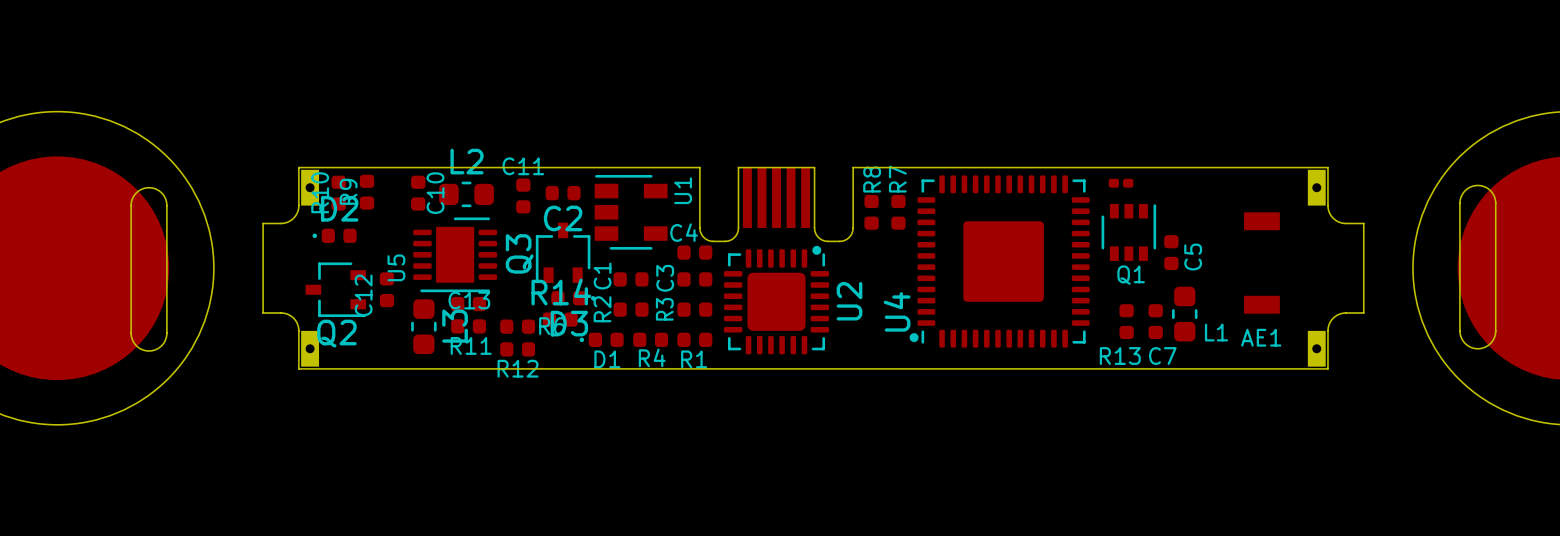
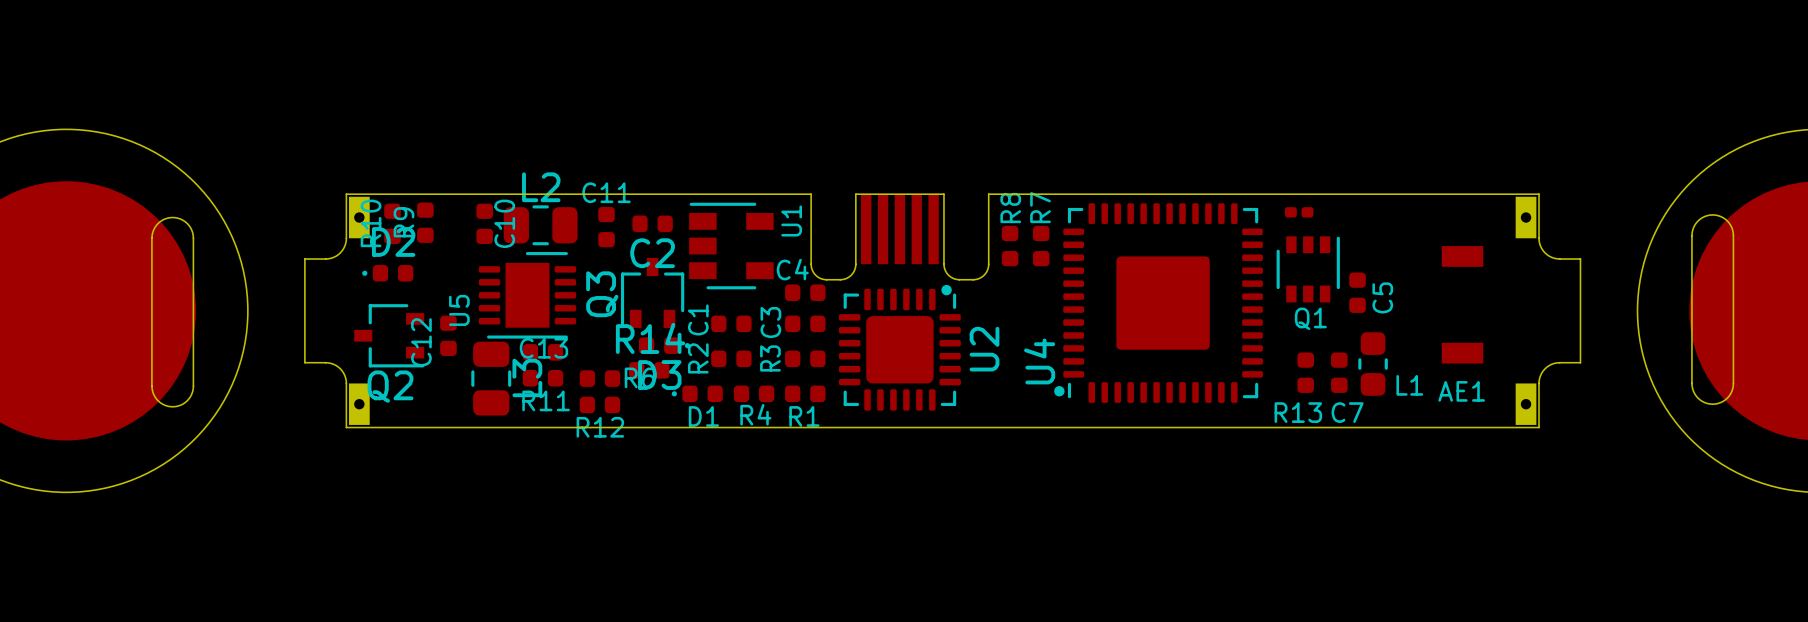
L2 footprint: [439, 181, 494, 208] -> [503, 205, 578, 246]
L3 footprint: [411, 299, 437, 355] -> [471, 341, 512, 416]

